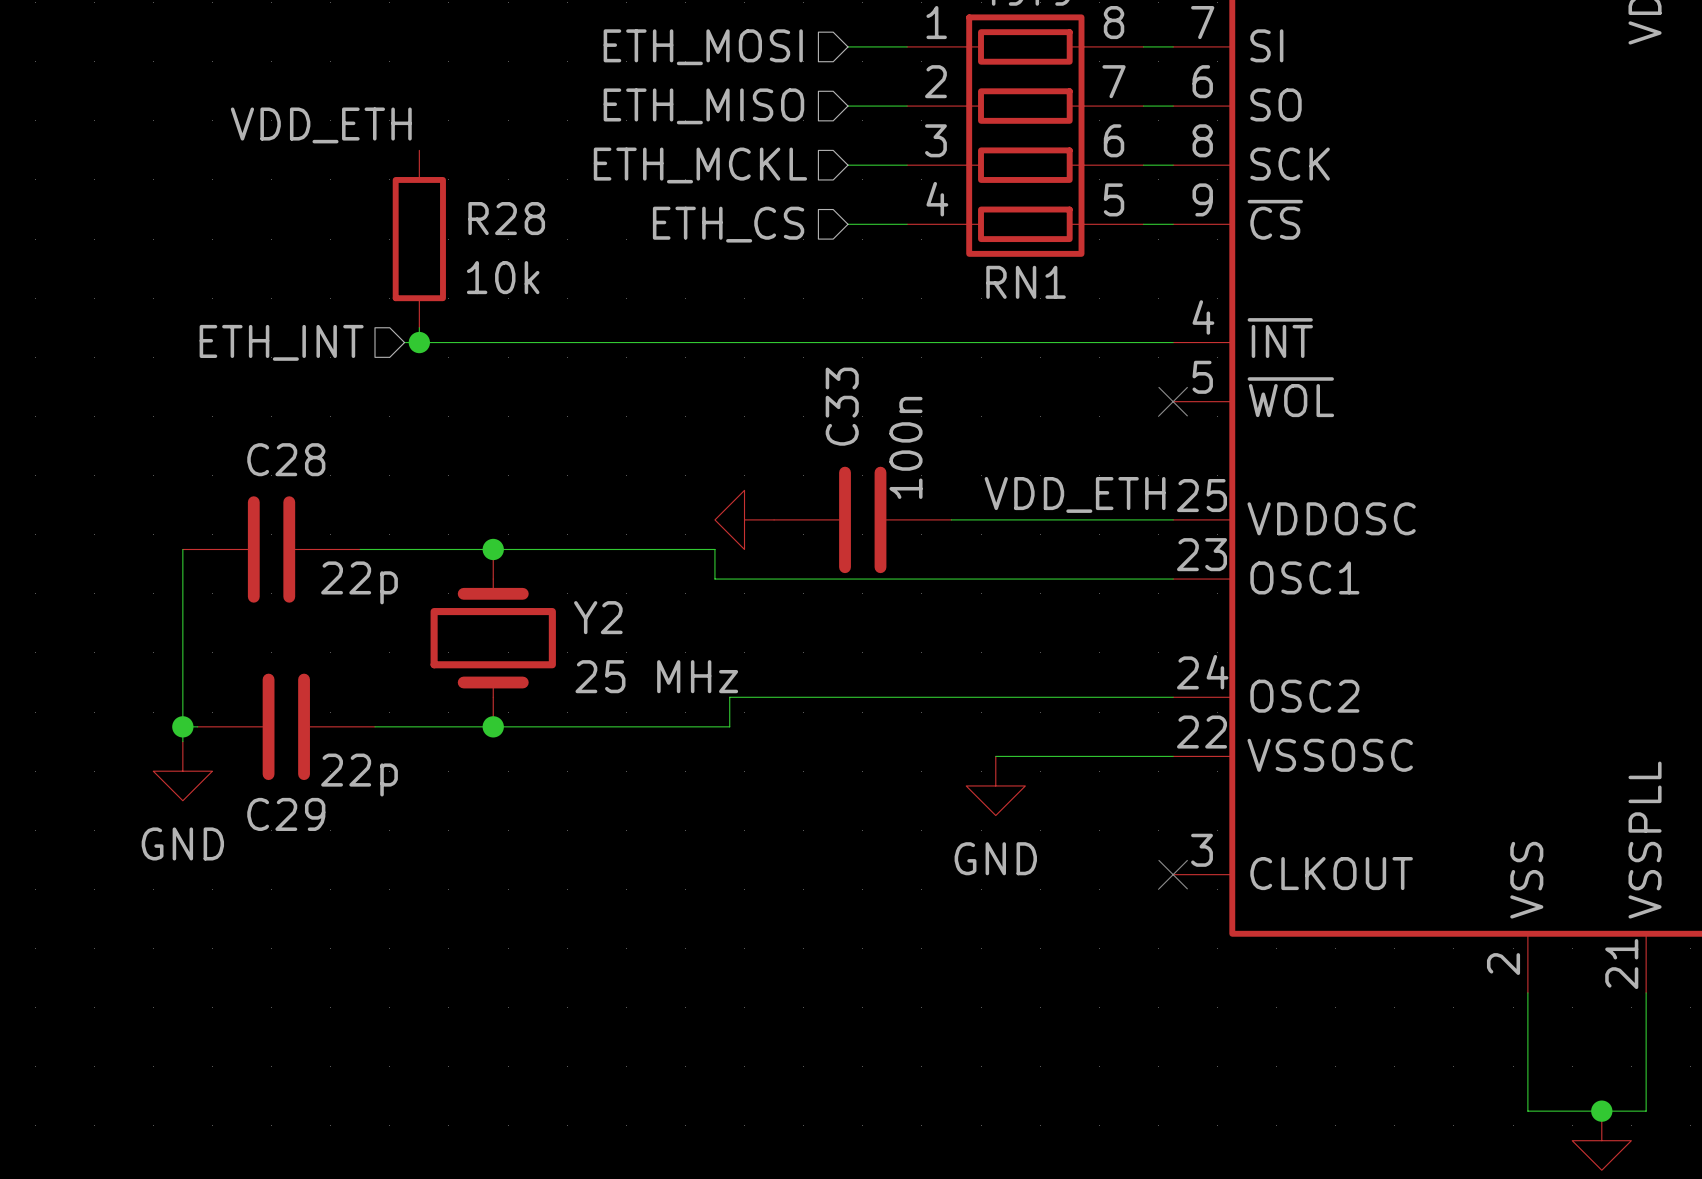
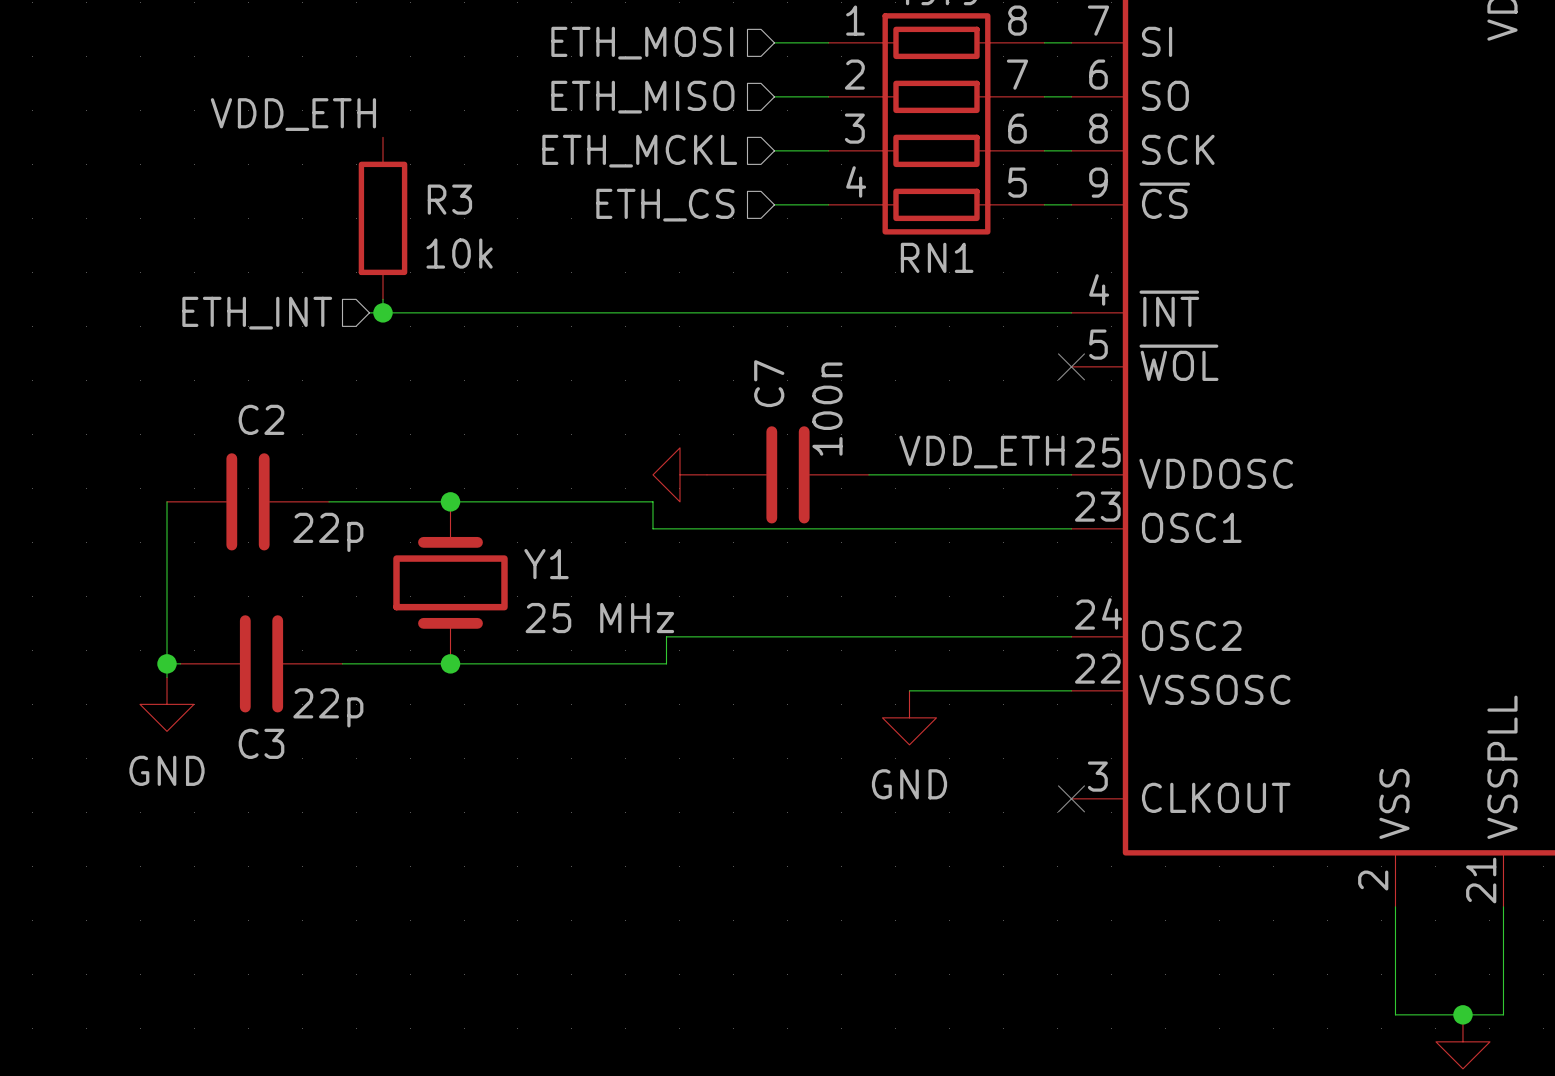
R28 name: R28 (506, 218) -> R3 (449, 199)
C33 name: C33 (842, 406) -> C7 (769, 383)
C28 name: C28 (286, 459) -> C2 (261, 419)
Y2 name: Y2 (598, 617) -> Y1 (546, 564)
C29 name: C29 (286, 814) -> C3 (261, 743)

